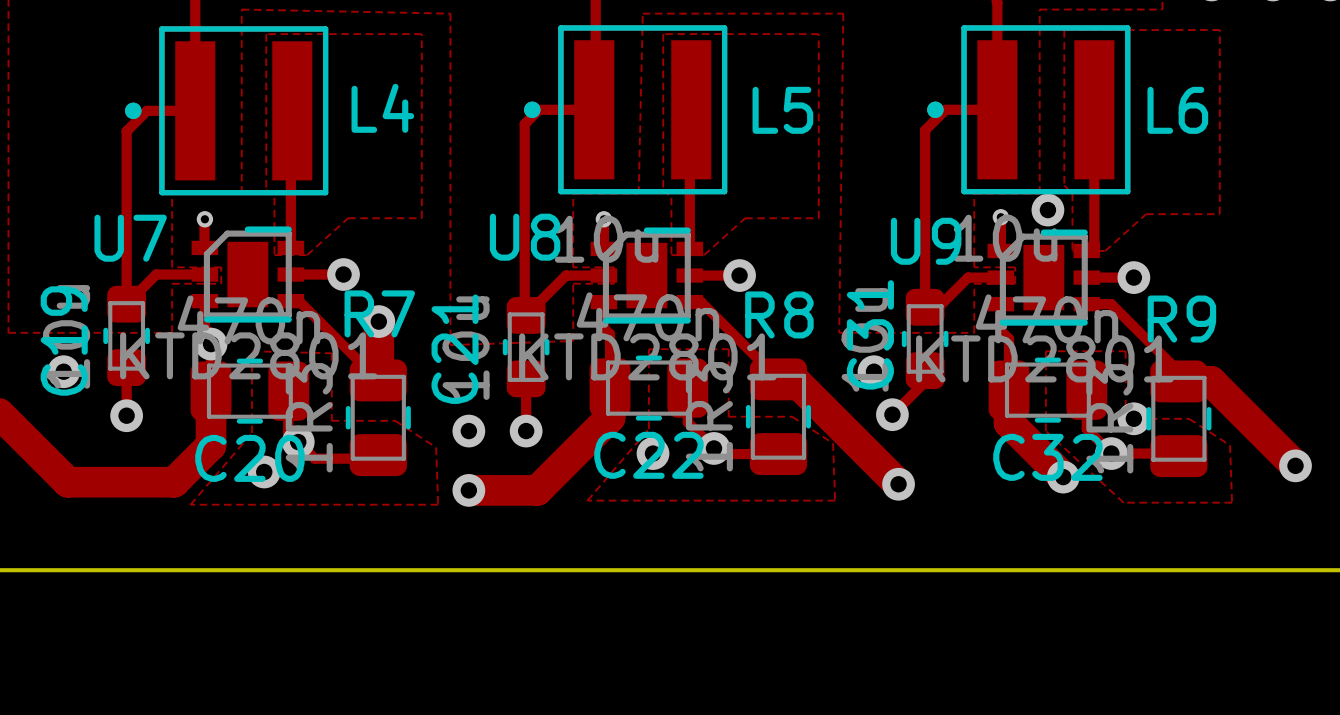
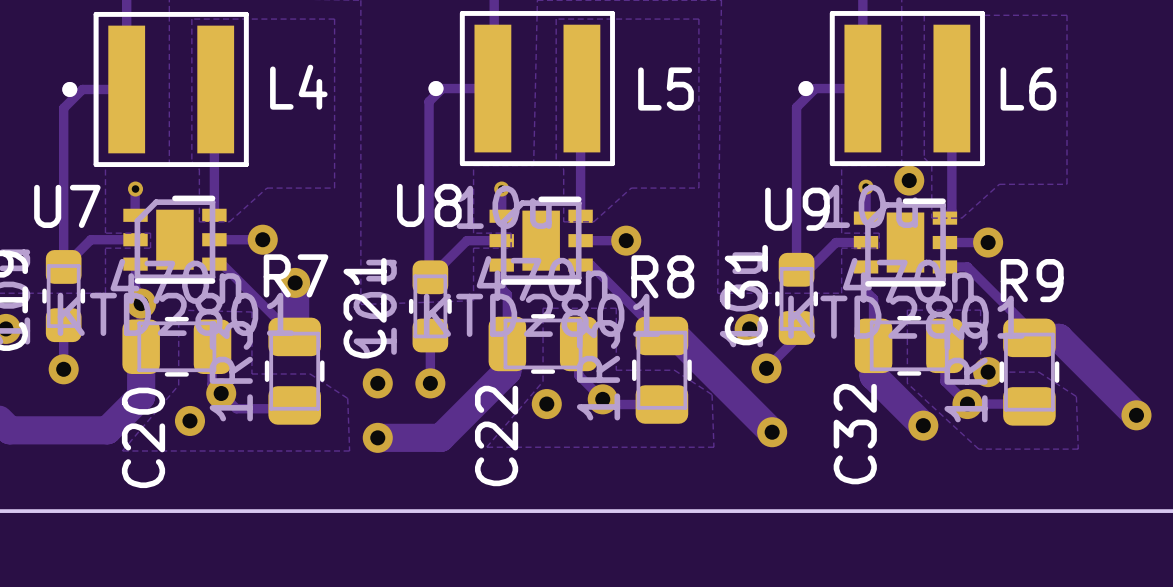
C22 name rotation: 0° (648, 455) -> 90° counterclockwise (496, 435)
C32 name rotation: 0° (1047, 457) -> 90° counterclockwise (855, 434)
C20 name rotation: 0° (249, 458) -> 90° counterclockwise (143, 437)

